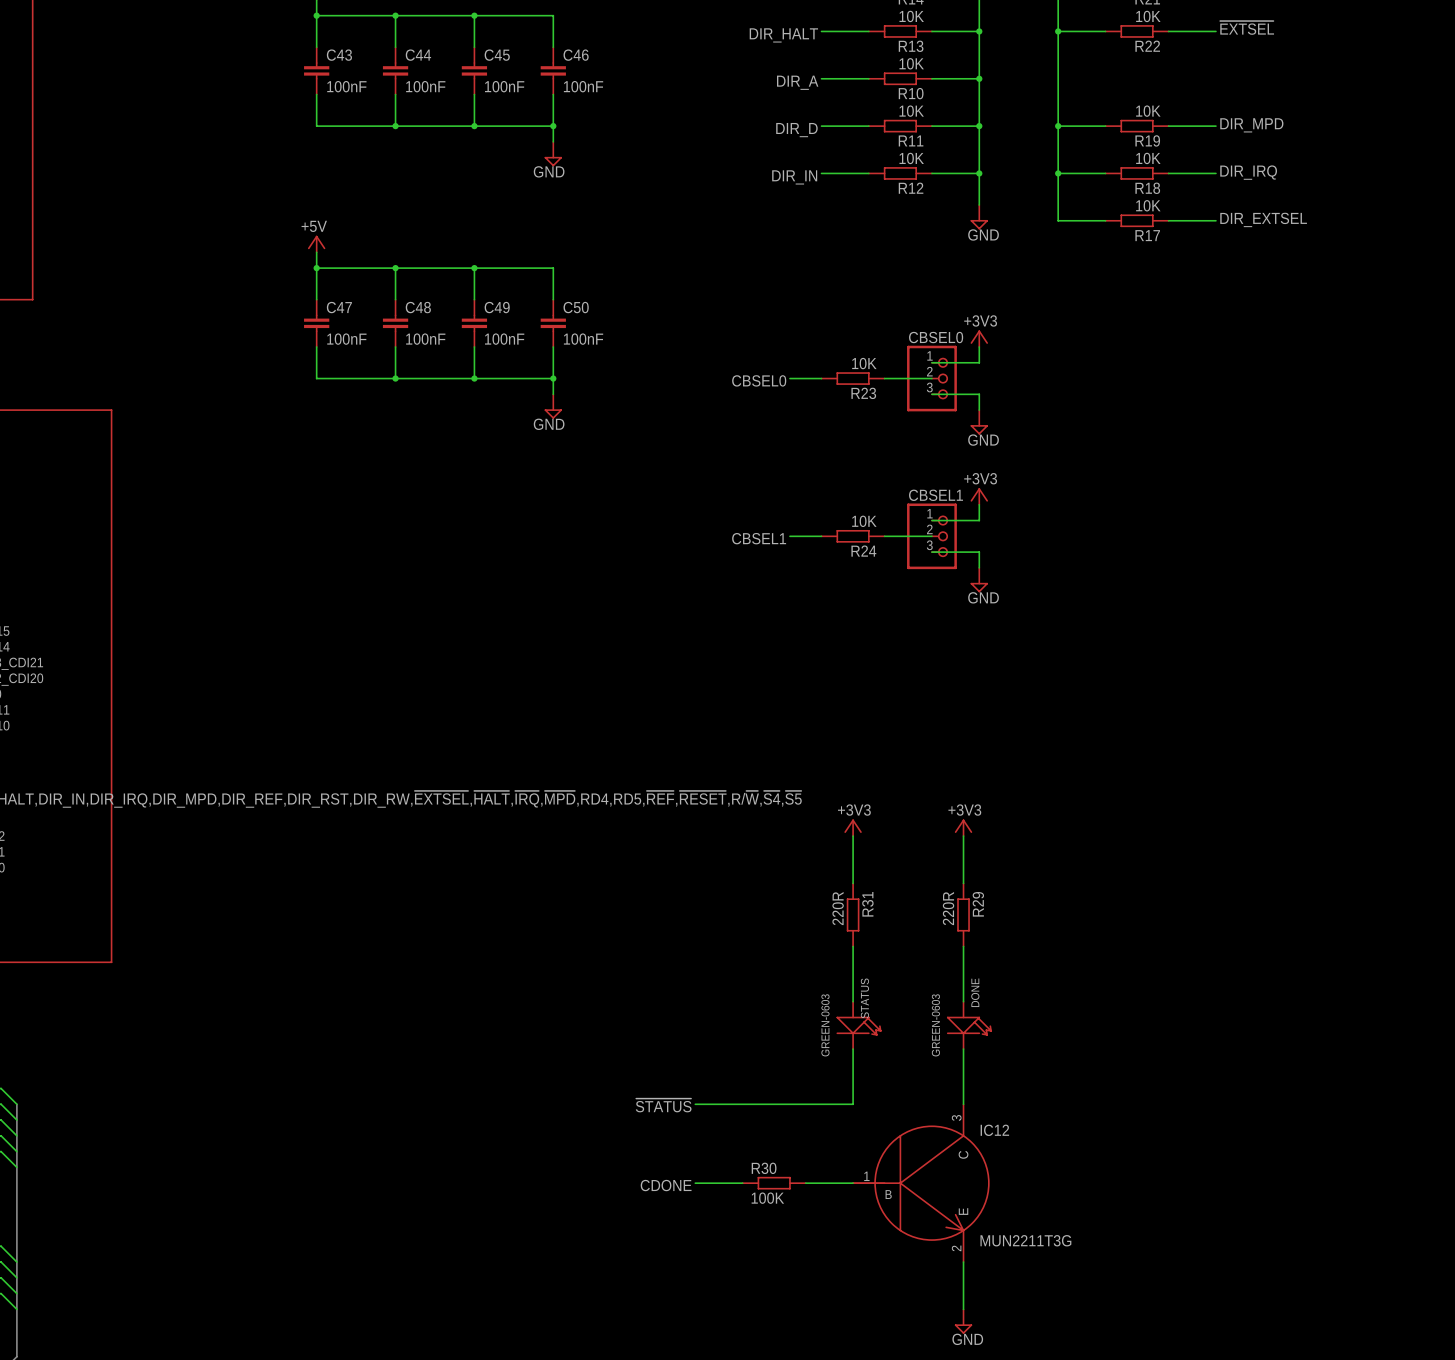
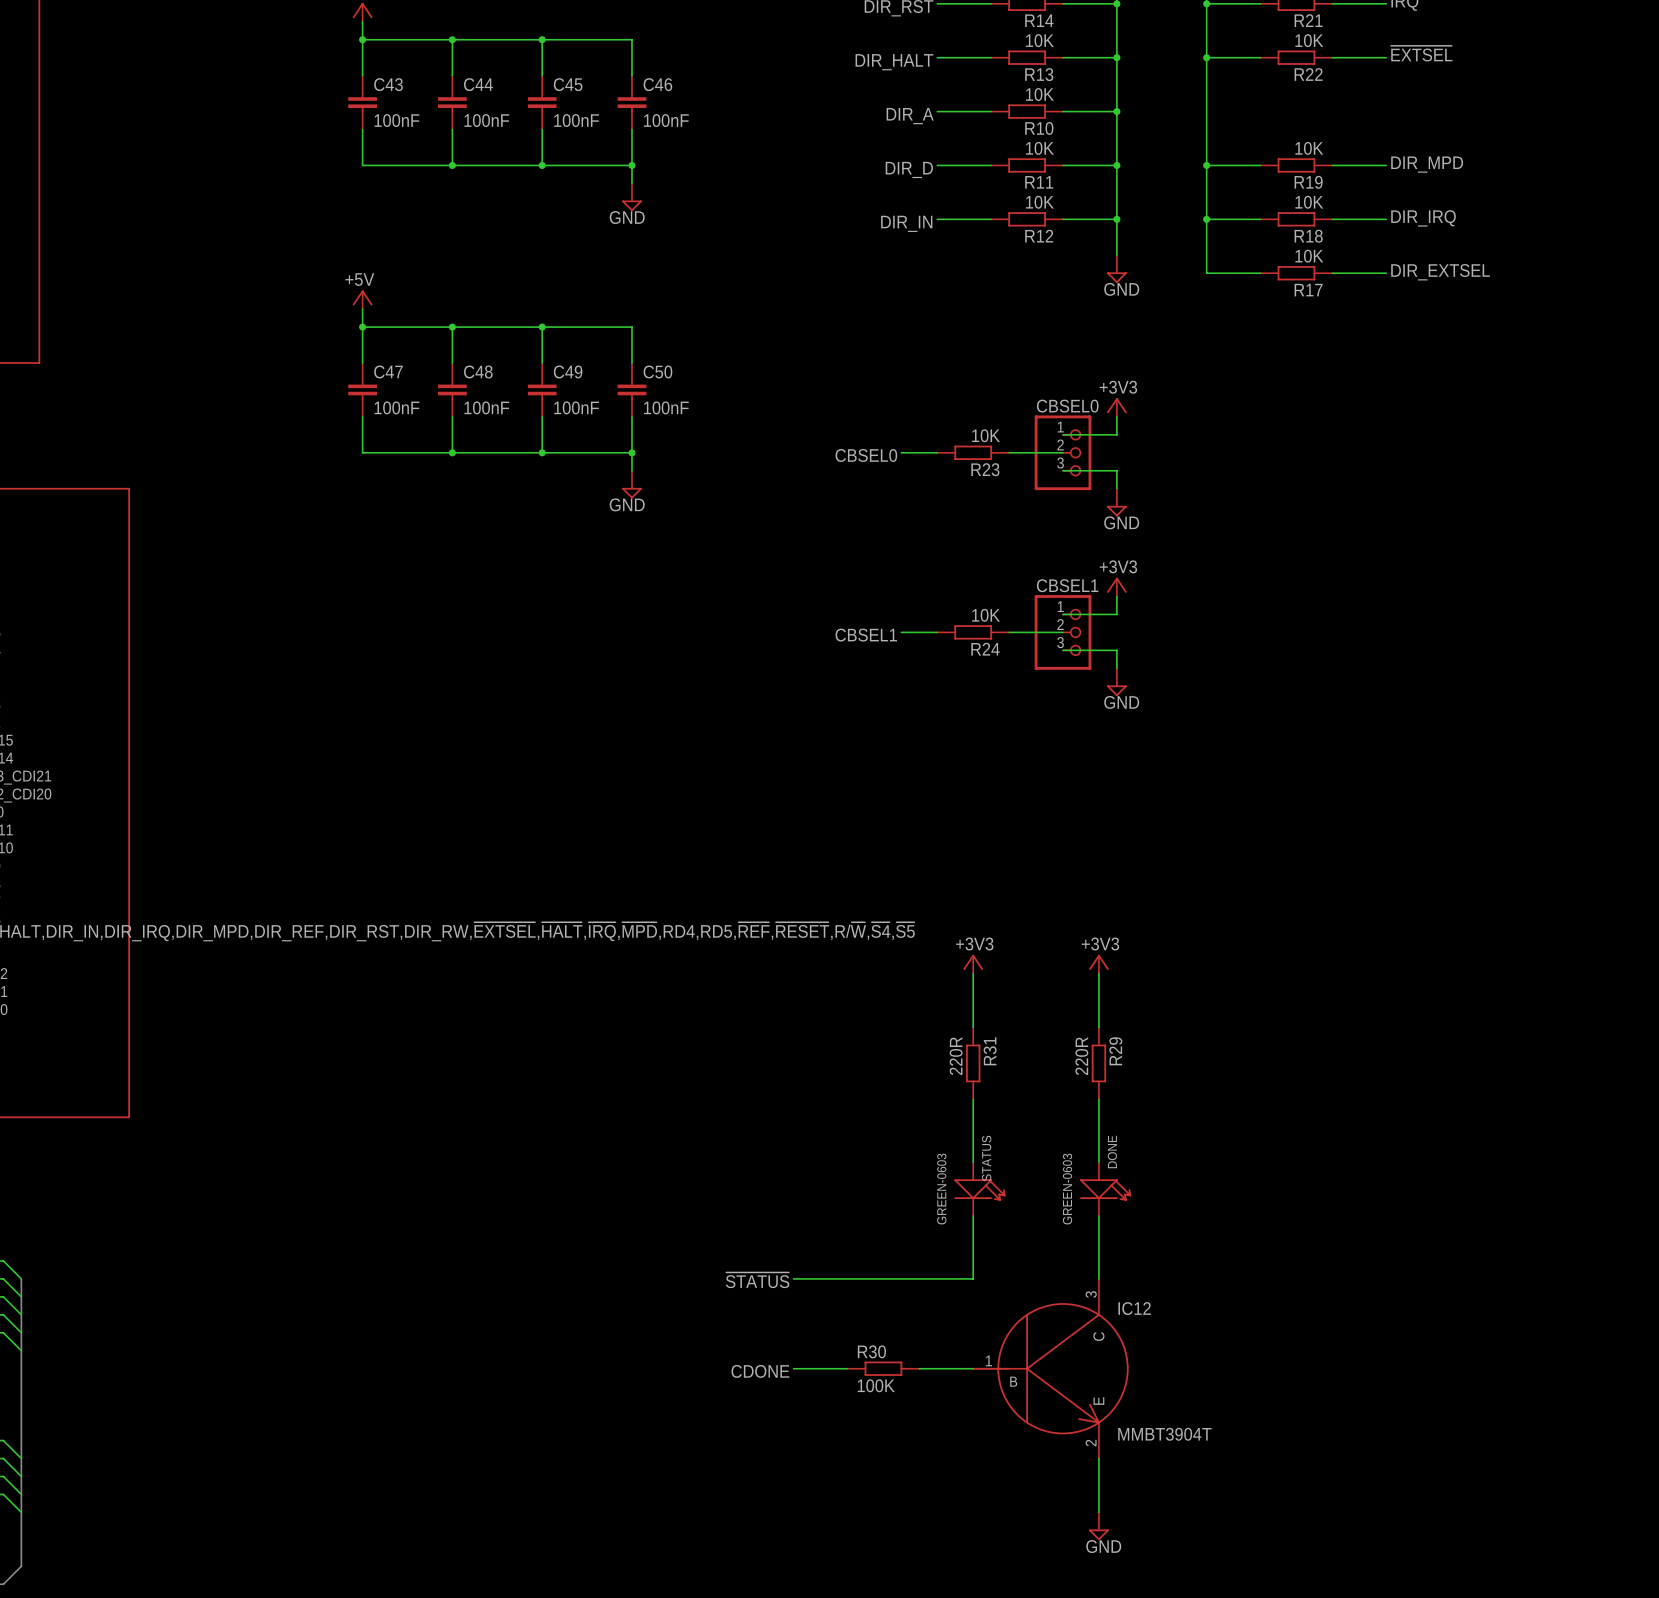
IC12 value: MUN2211T3G (1025, 1240) -> MMBT3904T (1164, 1434)

